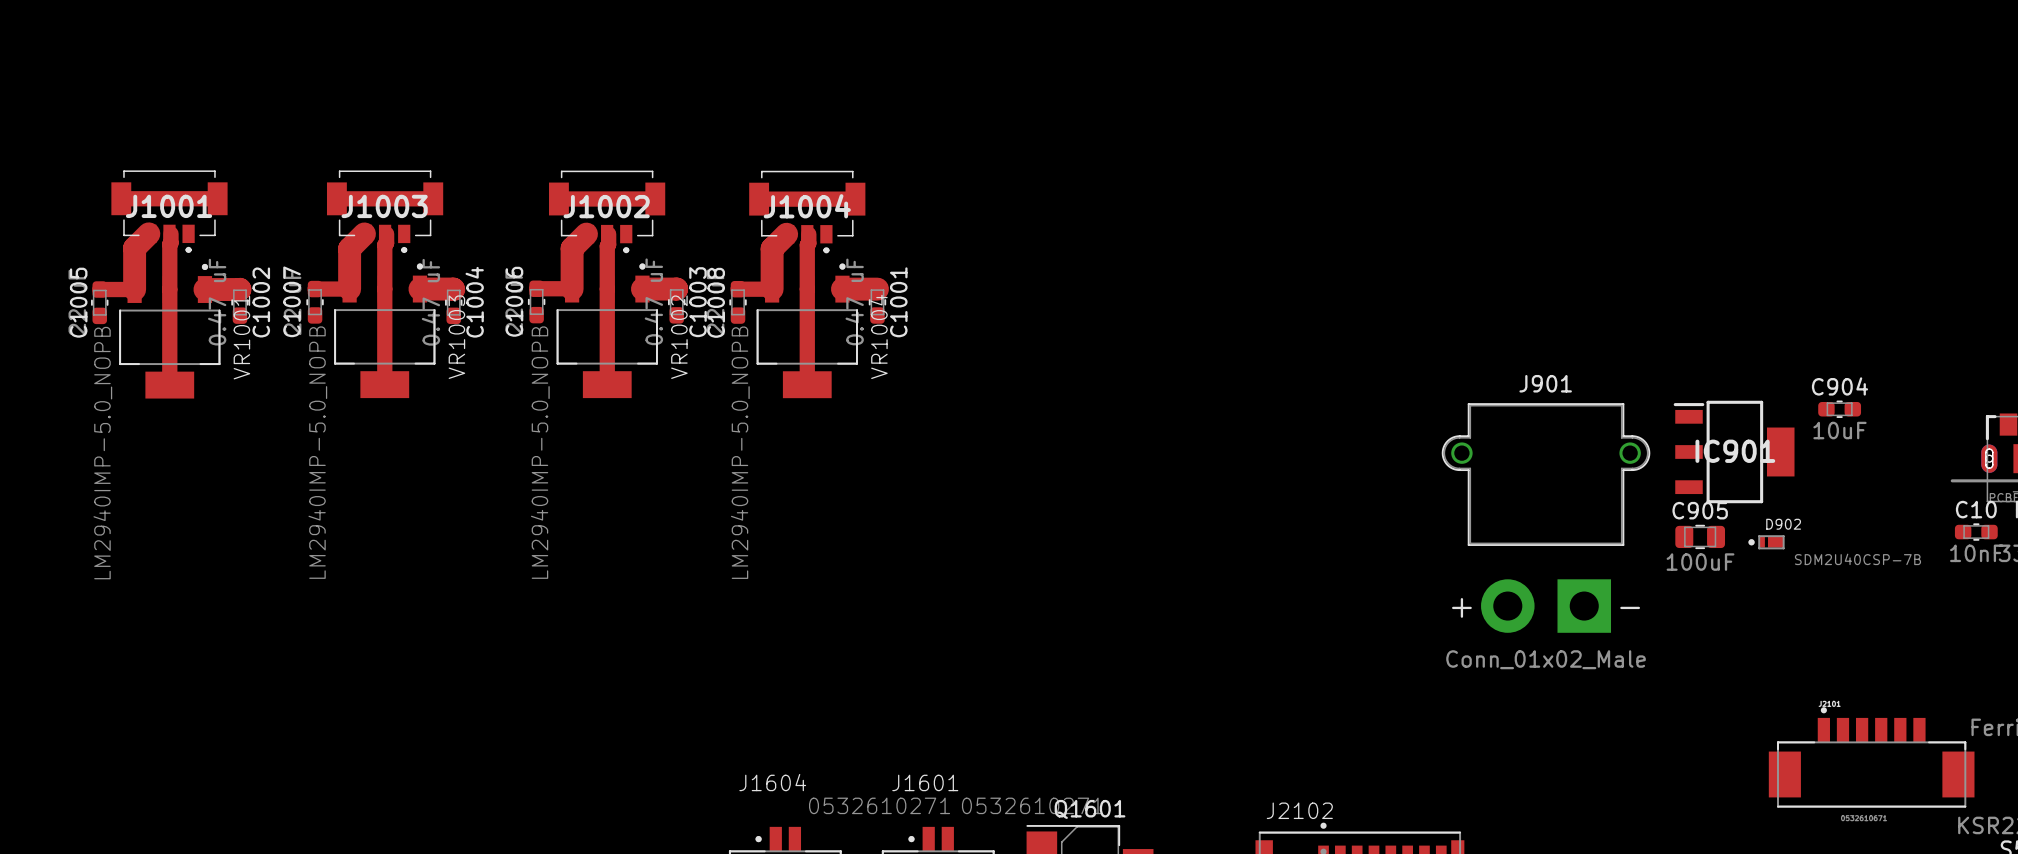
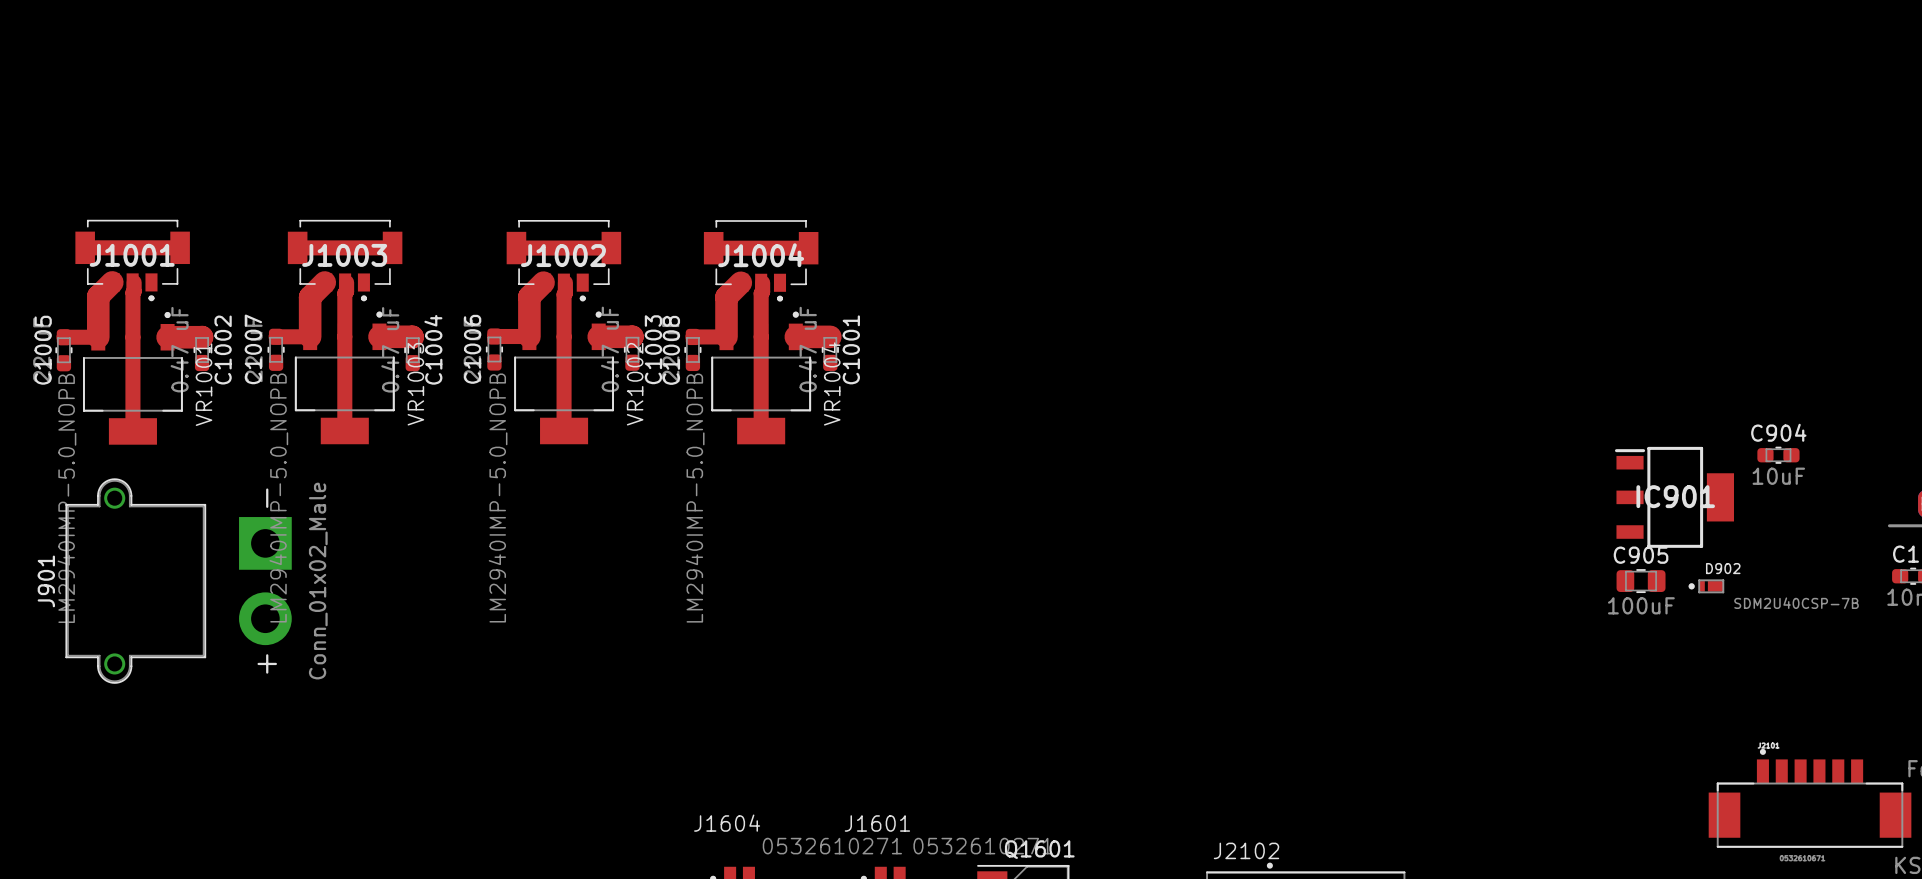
J901 rotation: 0° (1546, 517) -> 90° counterclockwise (178, 581)
J901 position: (1546, 517) -> (178, 581)

